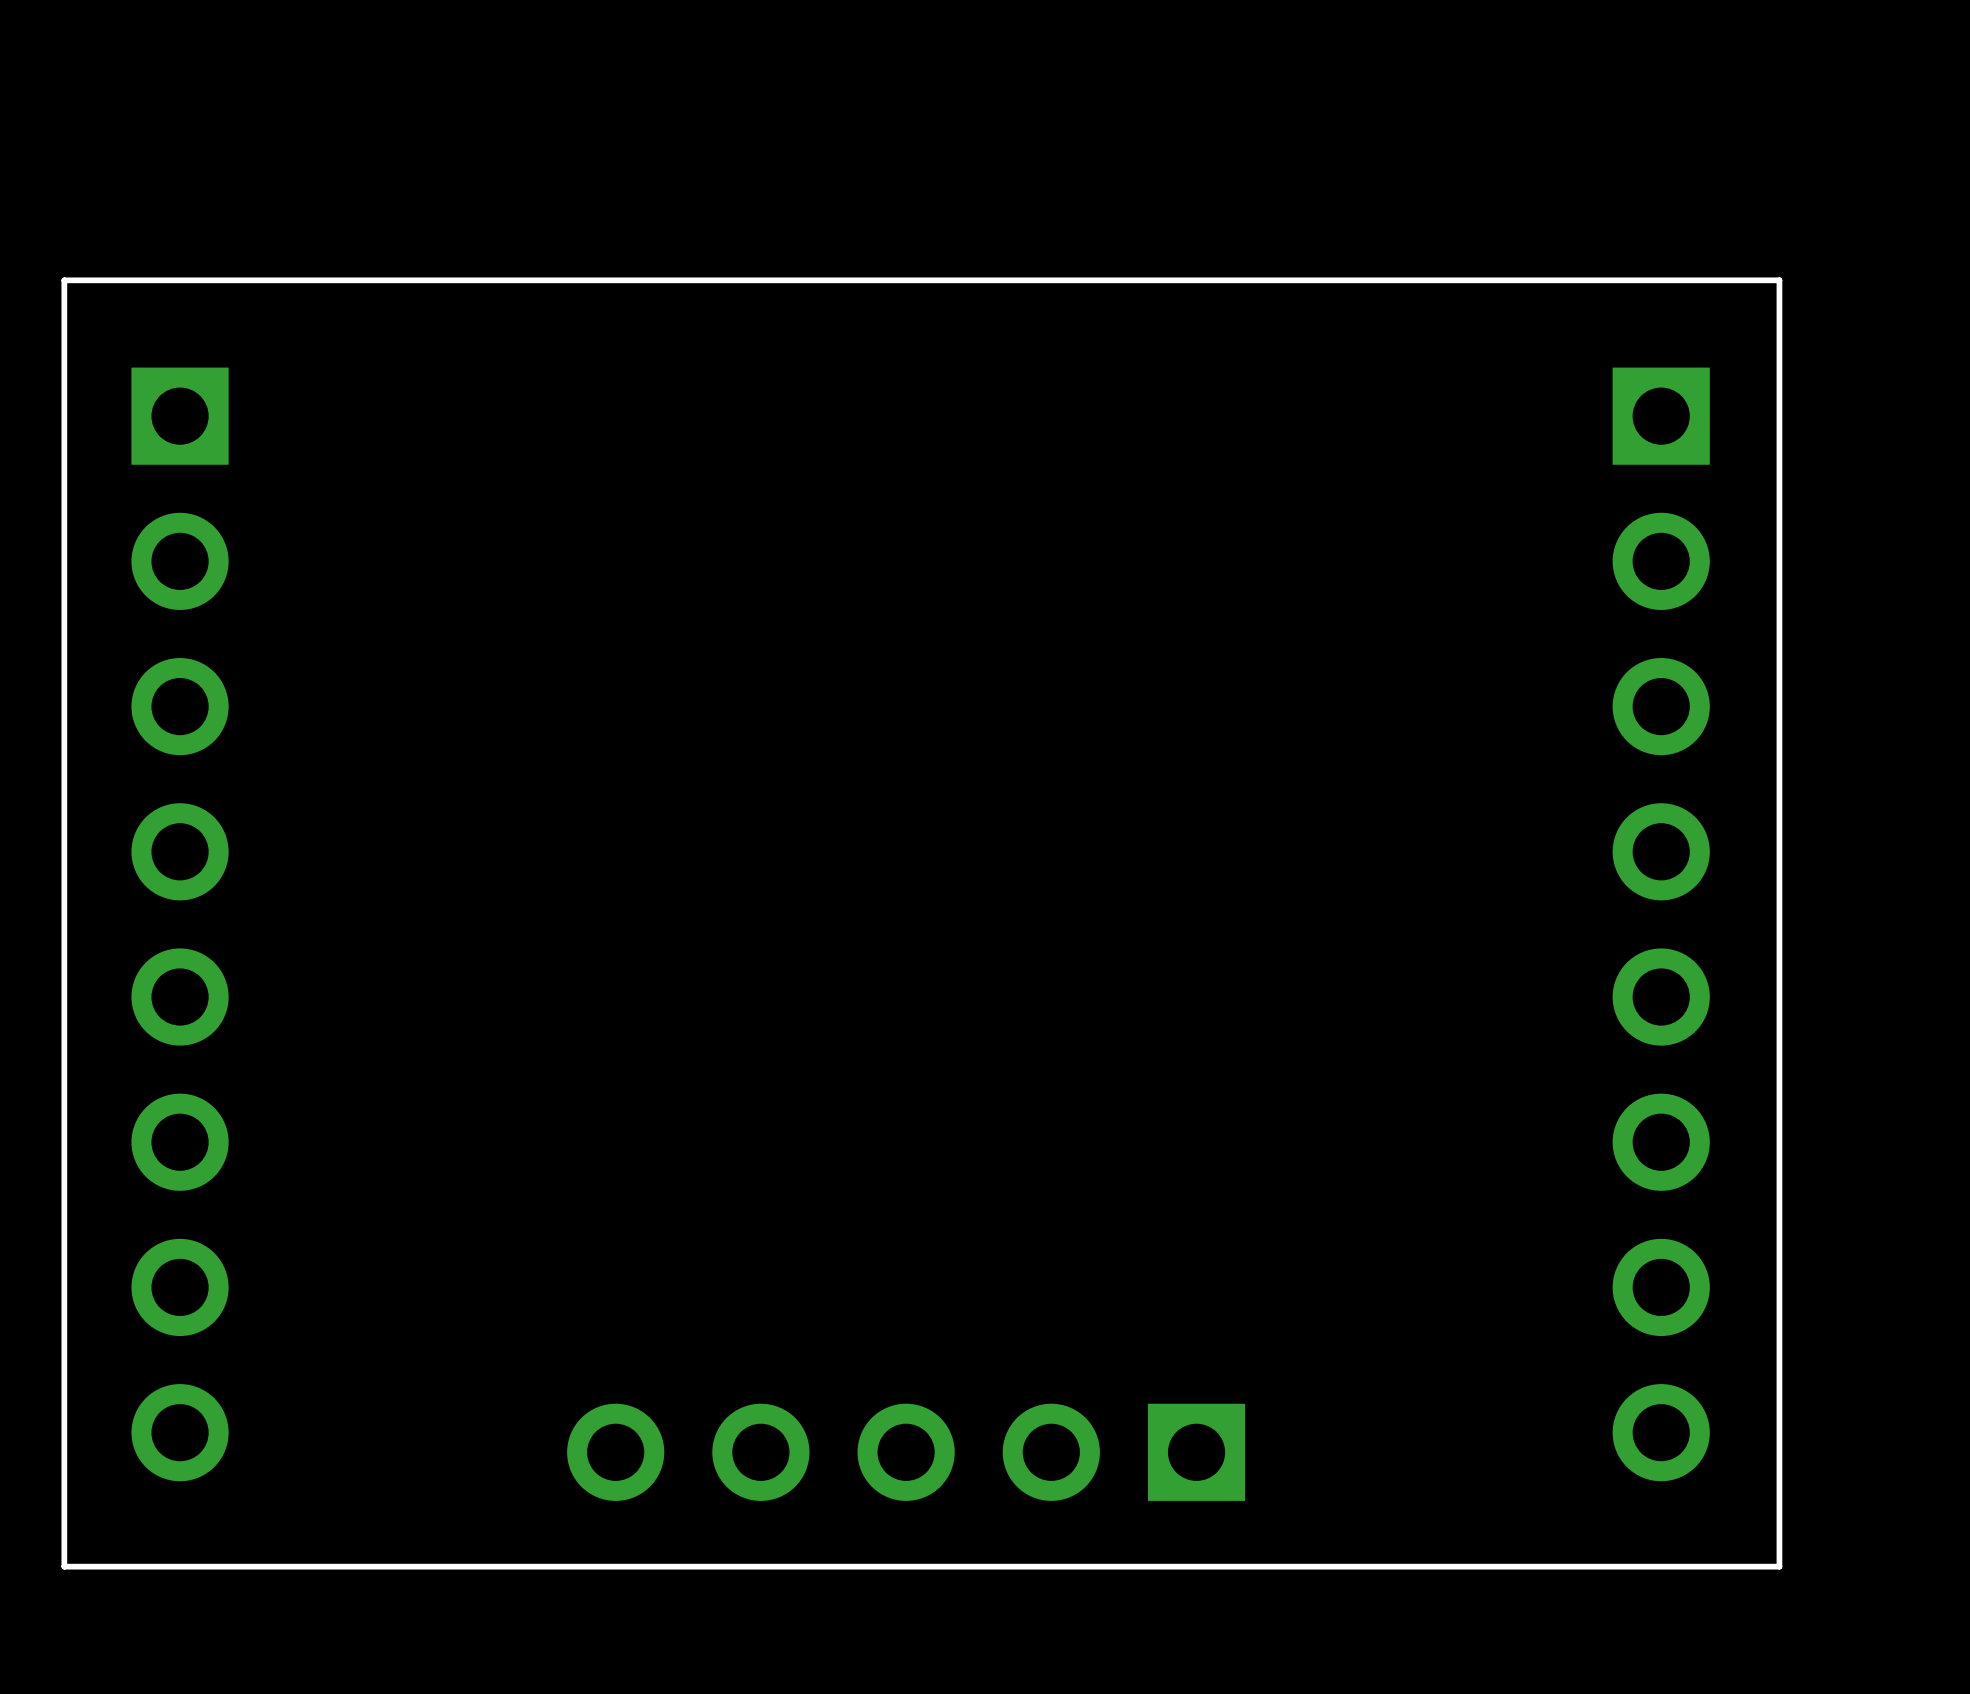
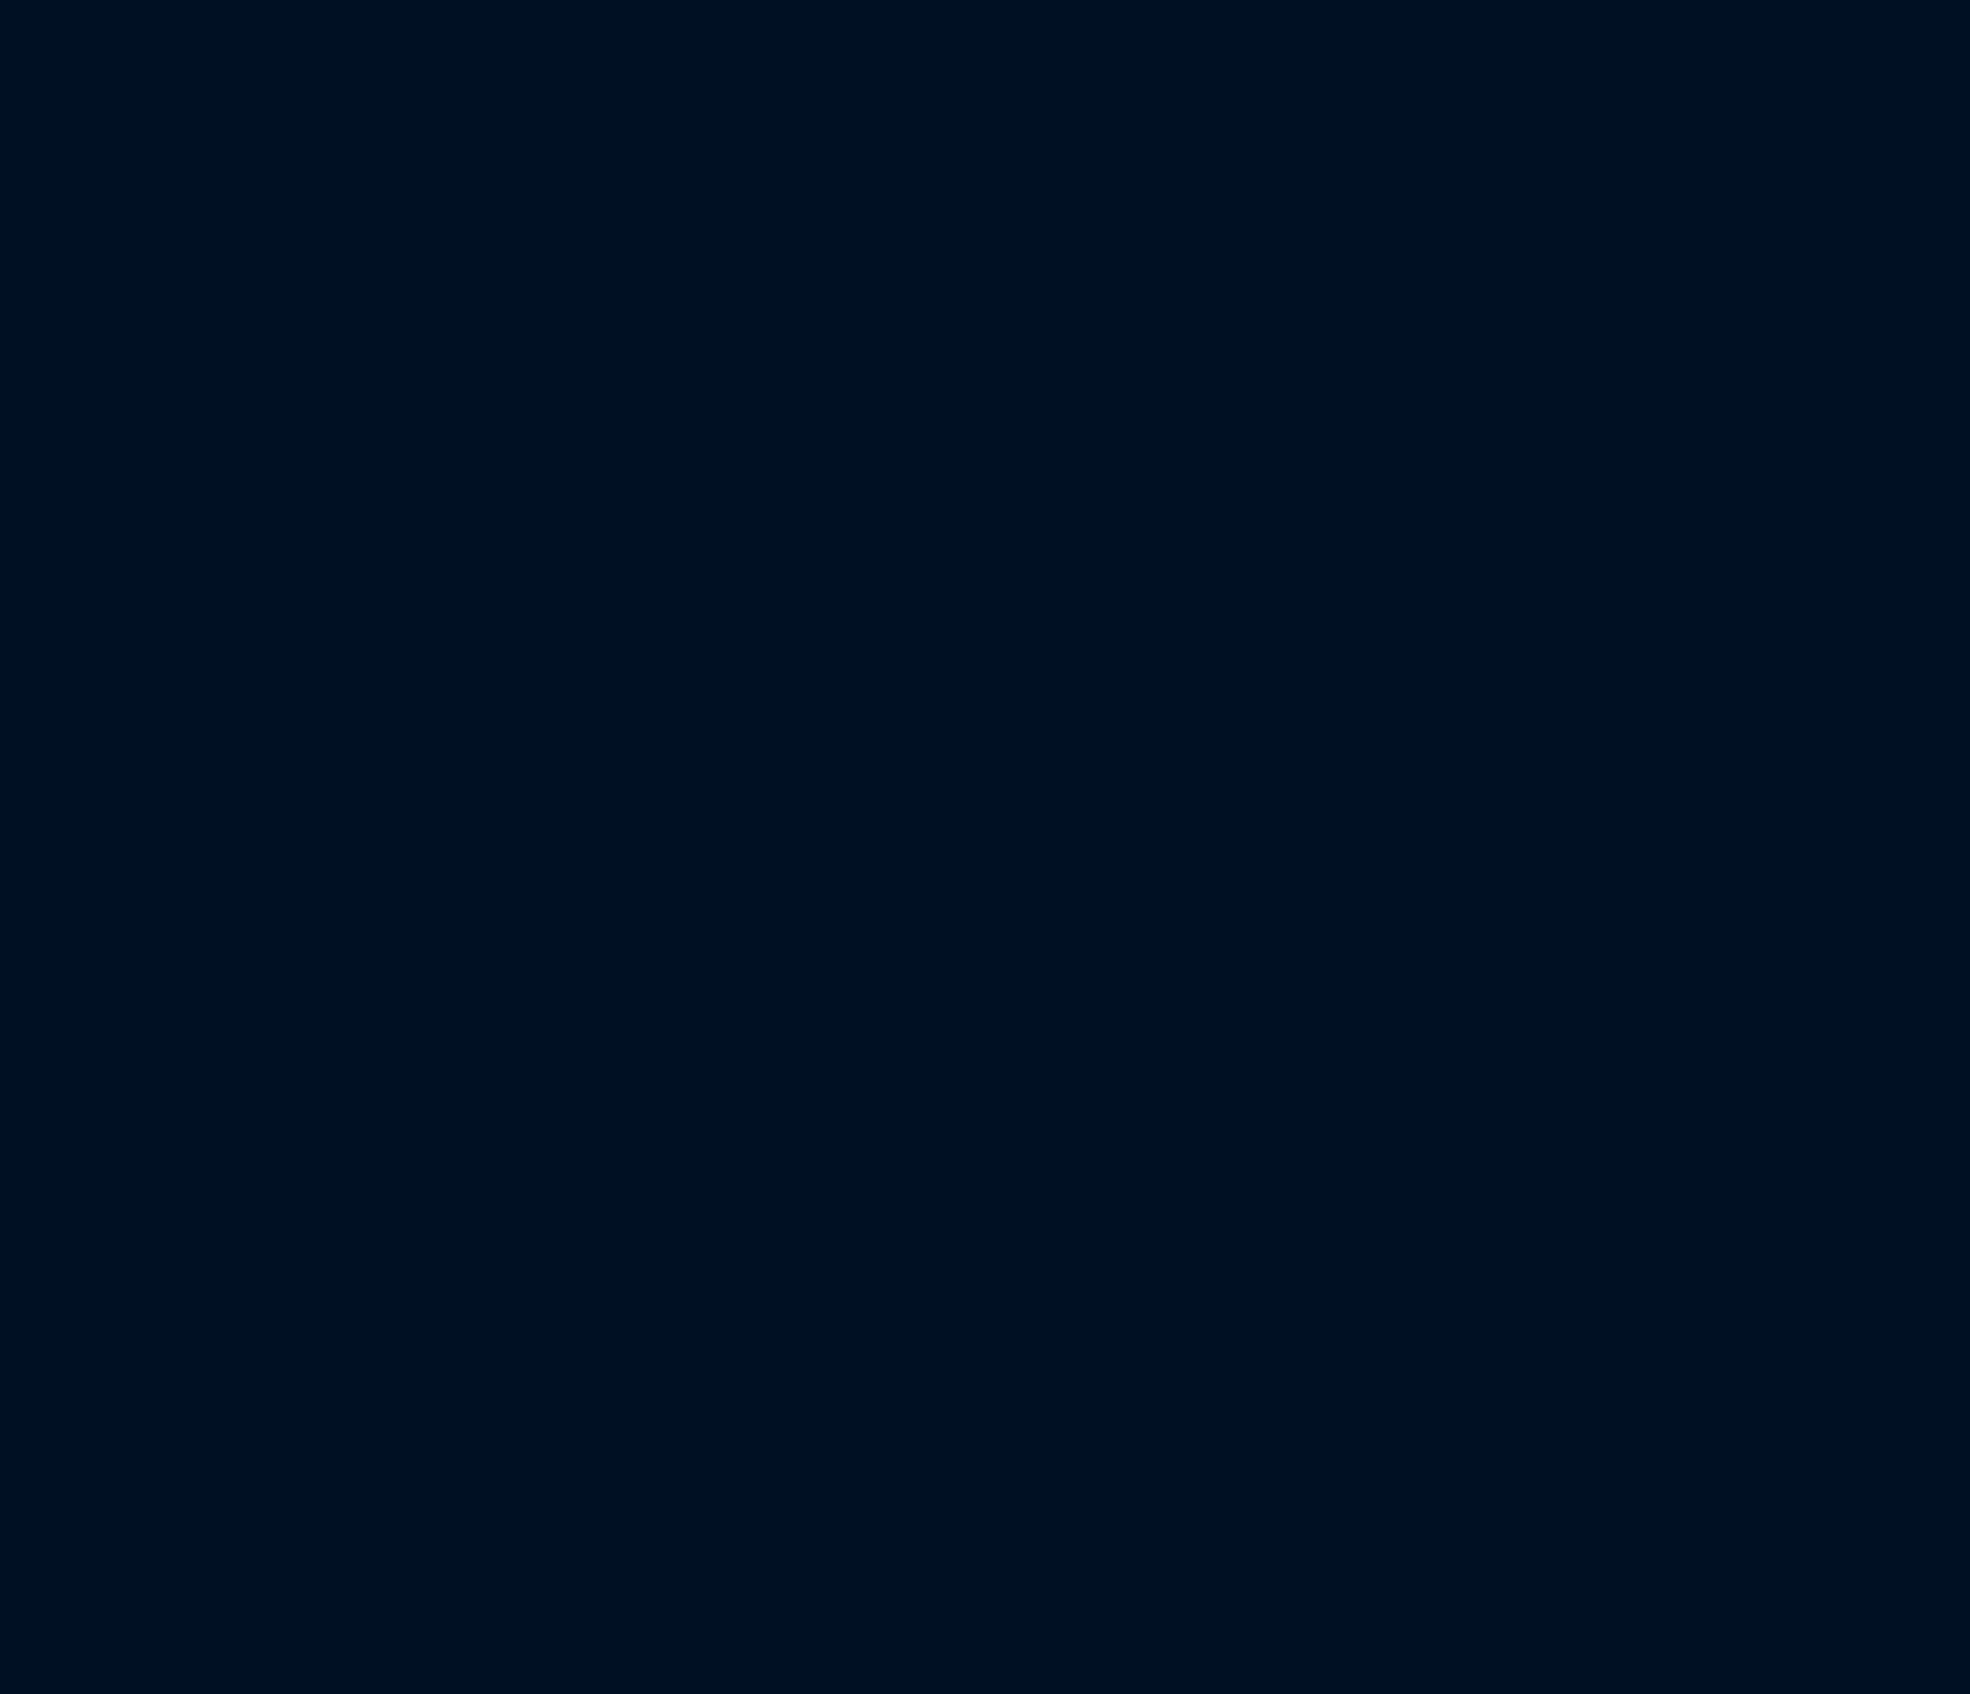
board edge: (1779, 280) (64, 280) (64, 1566) (1779, 1566) (1779, 280) -> none
part: (180, 924) -> none
part: (1661, 924) -> none
part: (906, 1452) -> none

